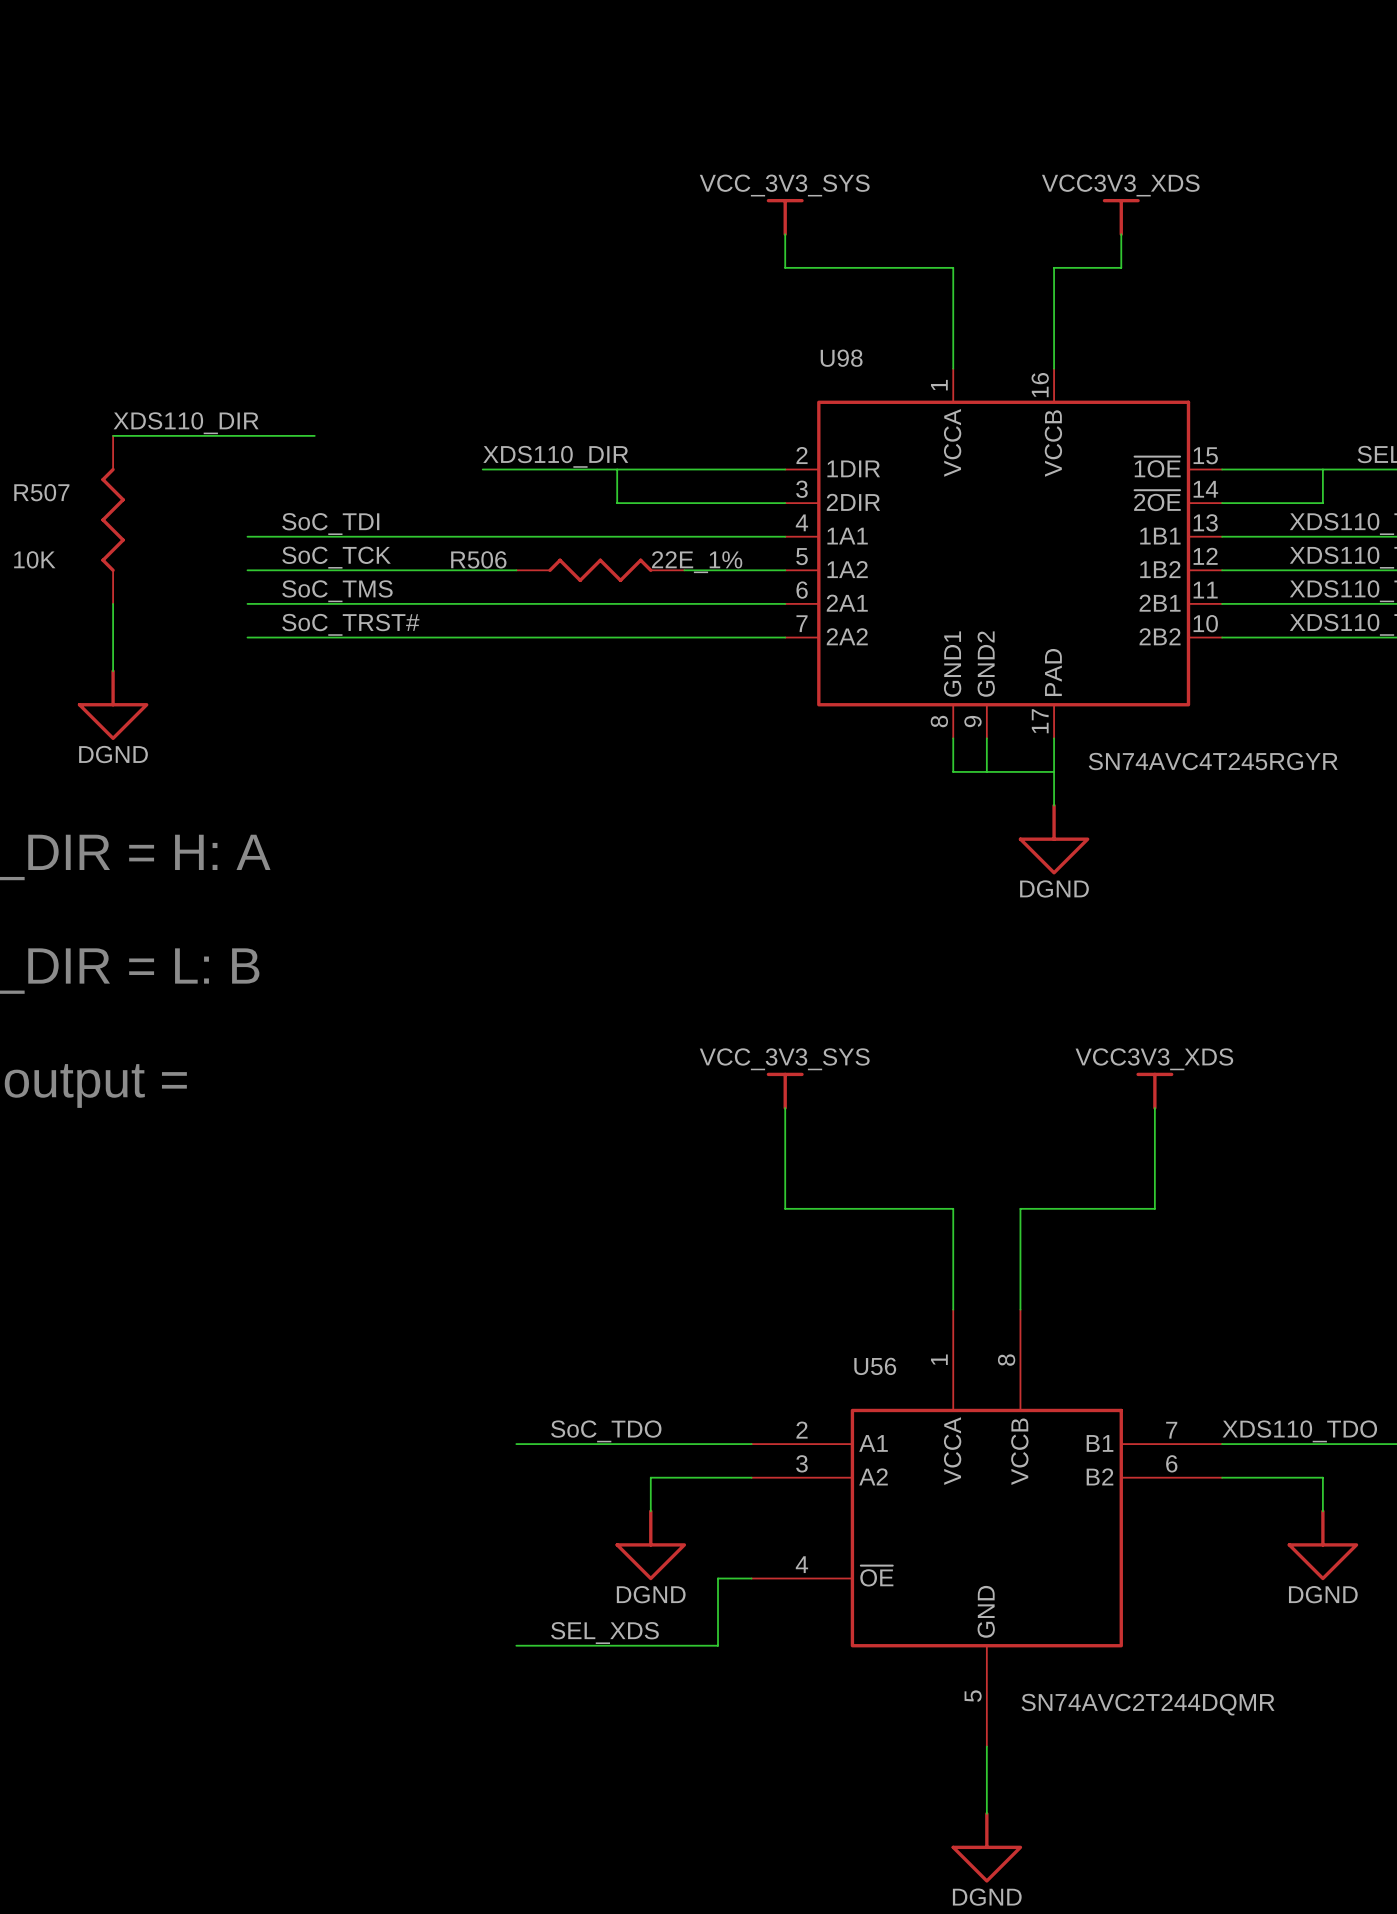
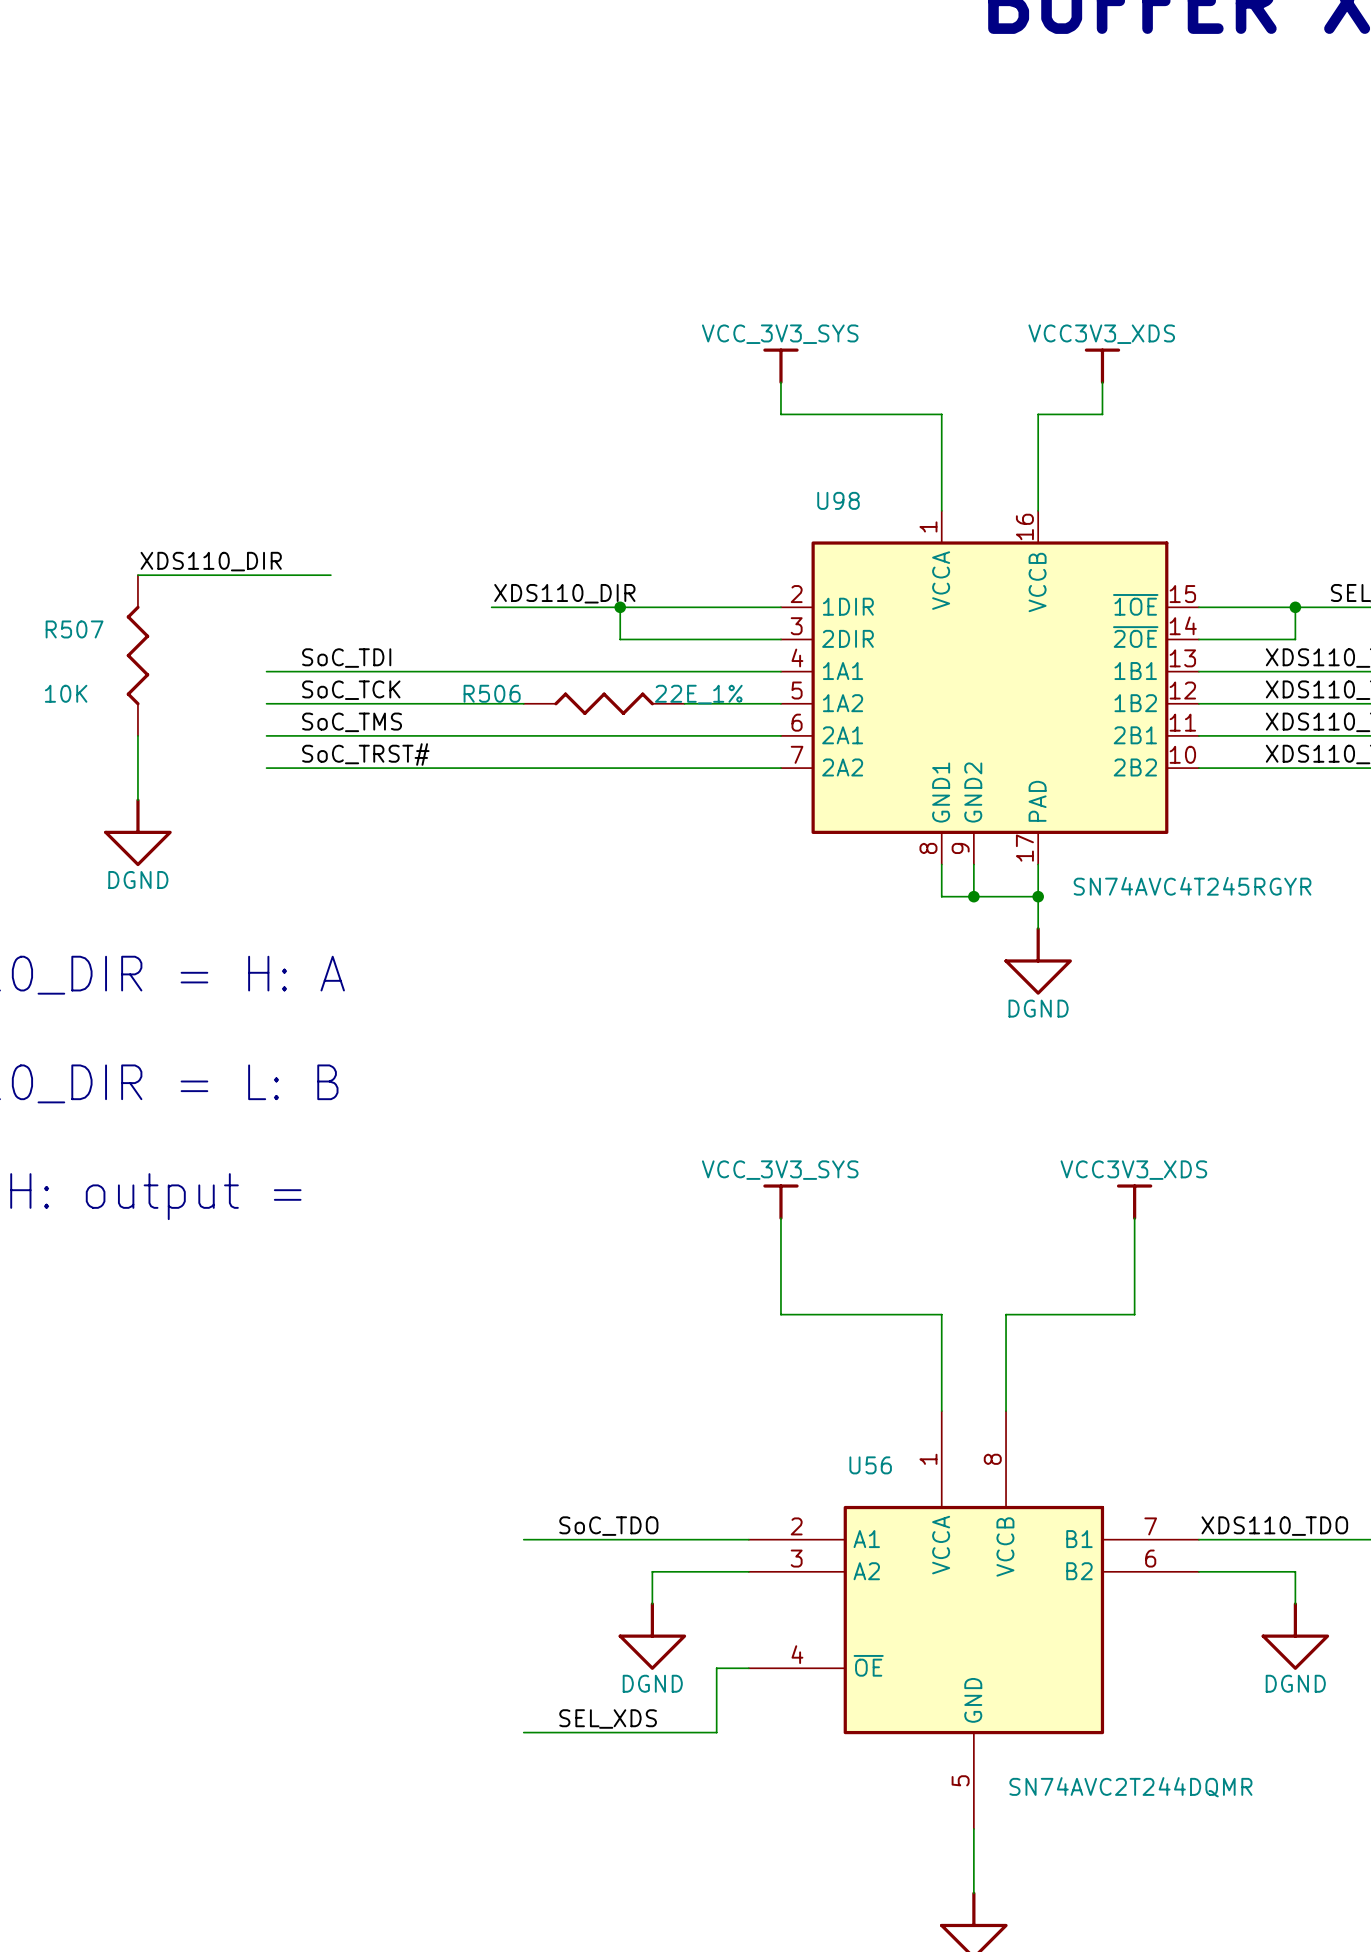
junction: none -> (620, 607)
junction: none -> (1295, 607)
junction: none -> (973, 896)
junction: none -> (1038, 896)

